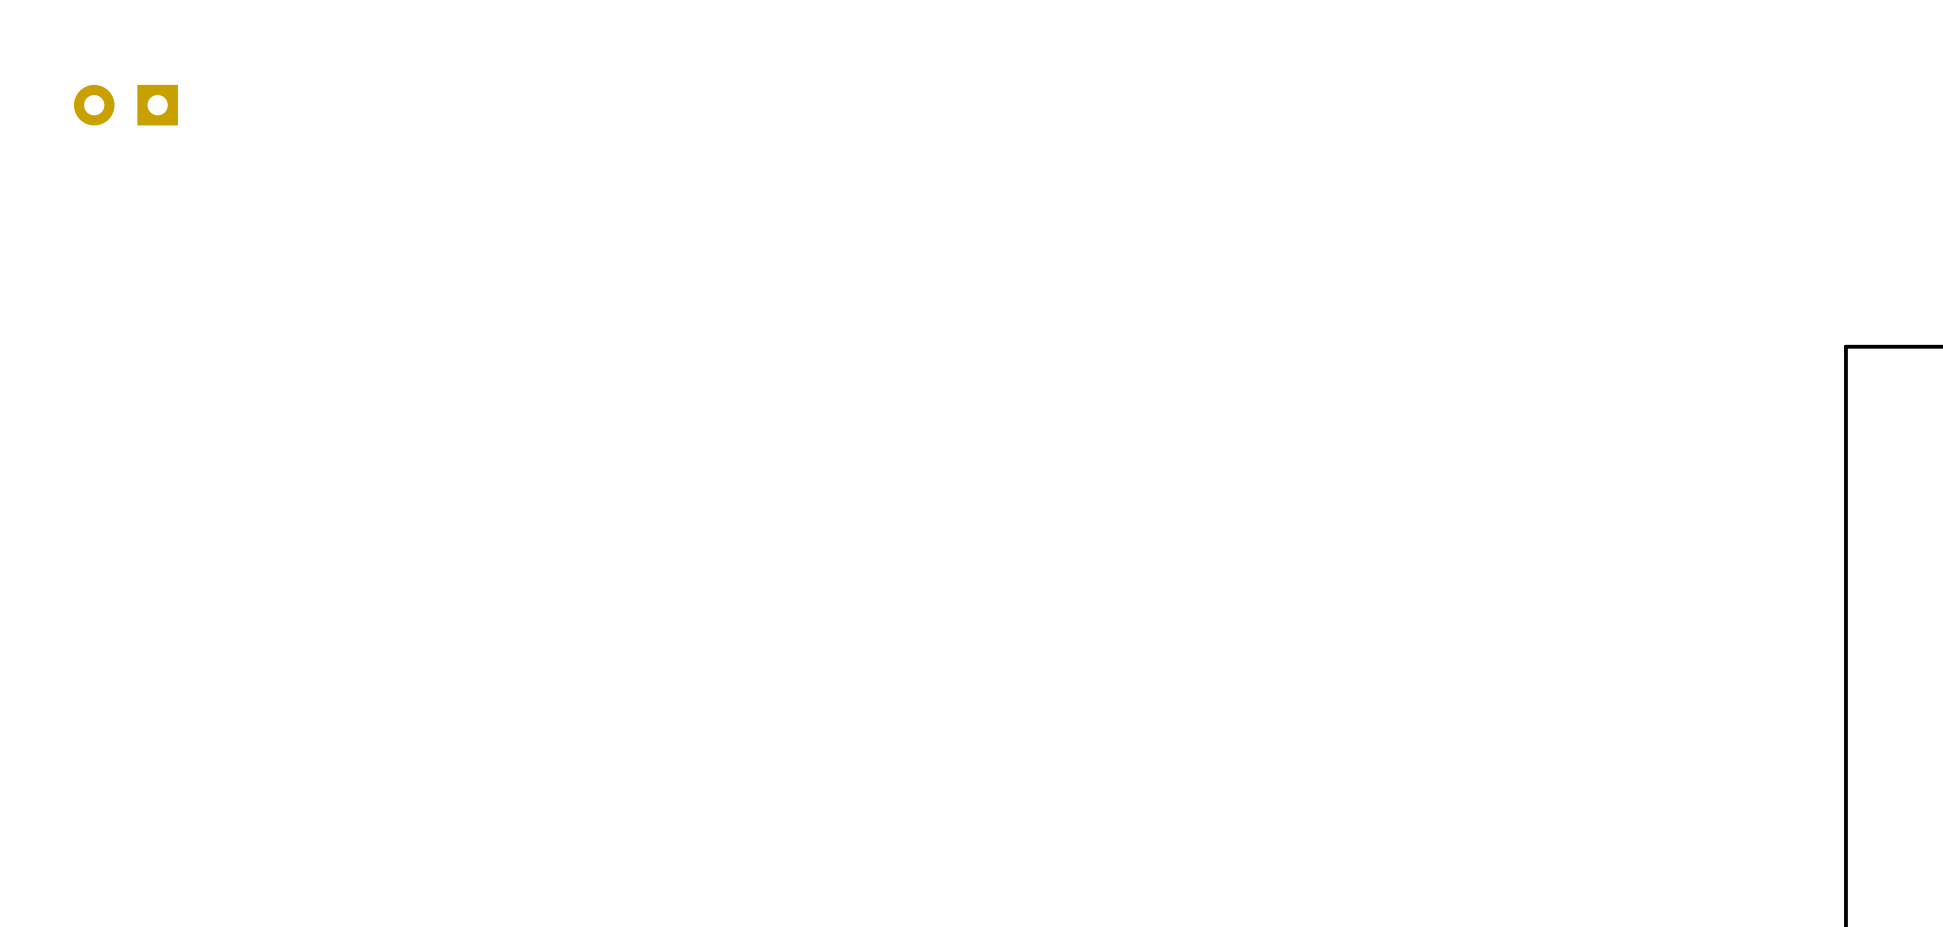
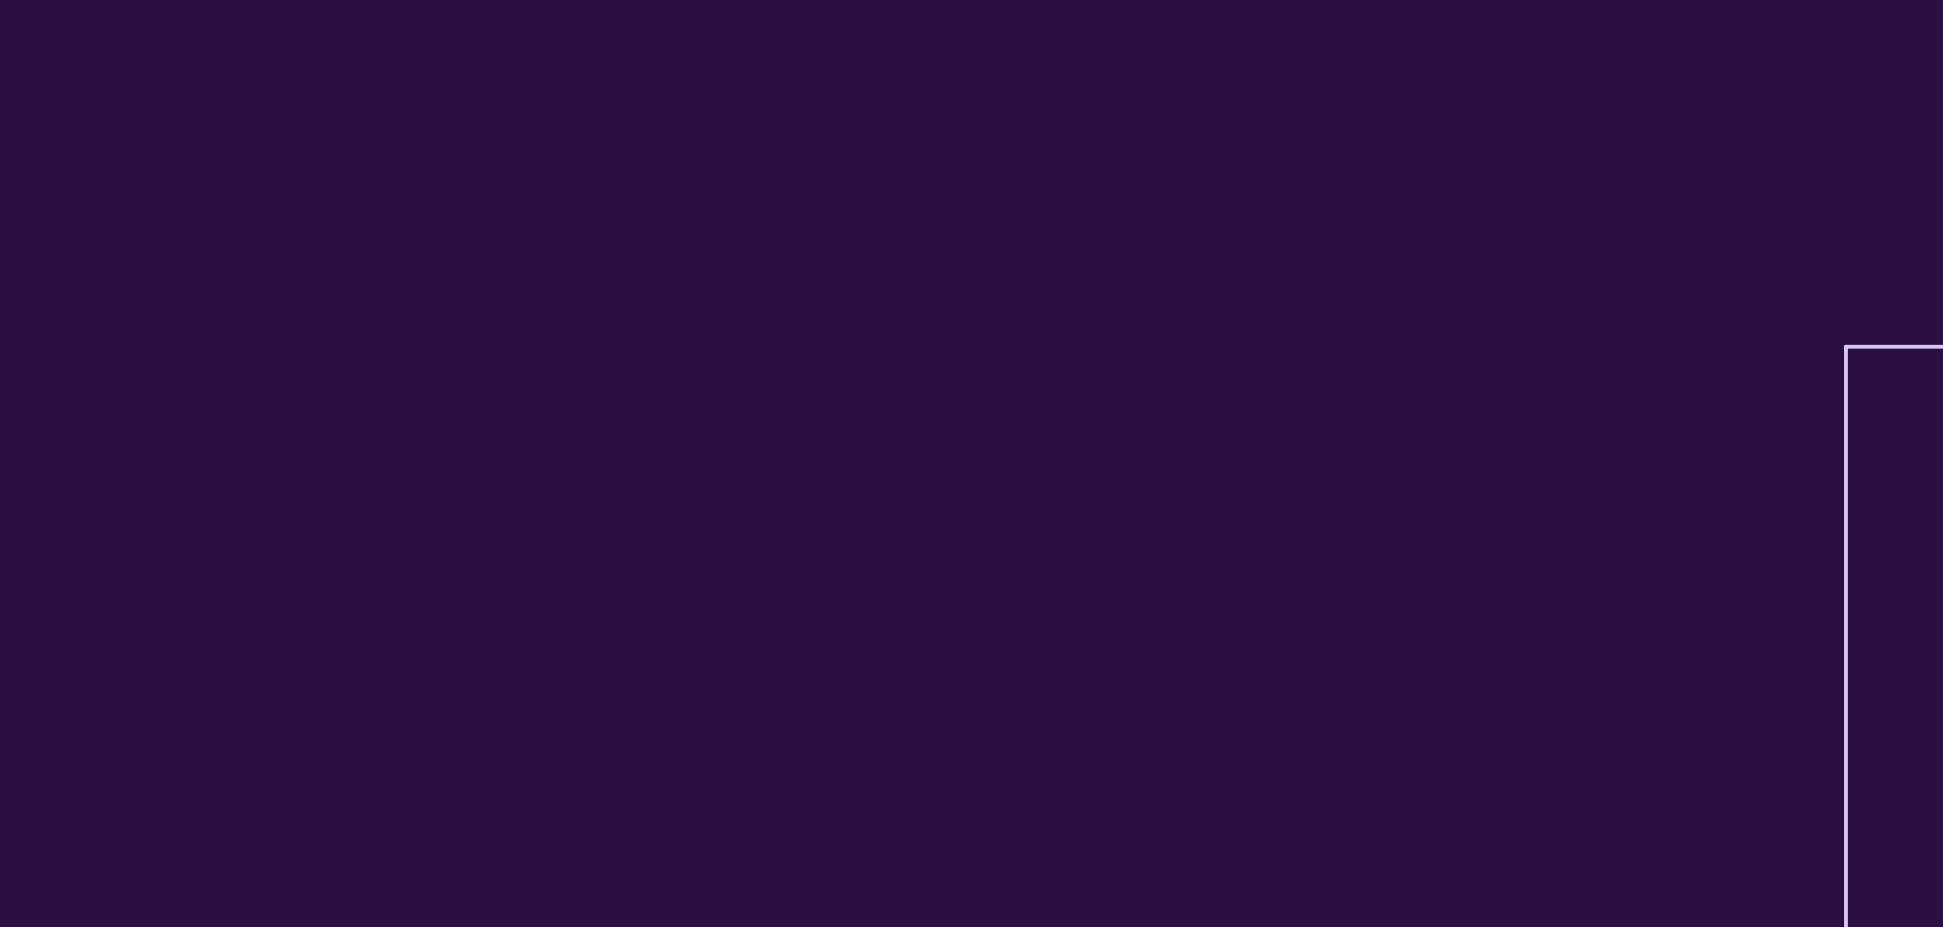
part: (125, 105) -> none

